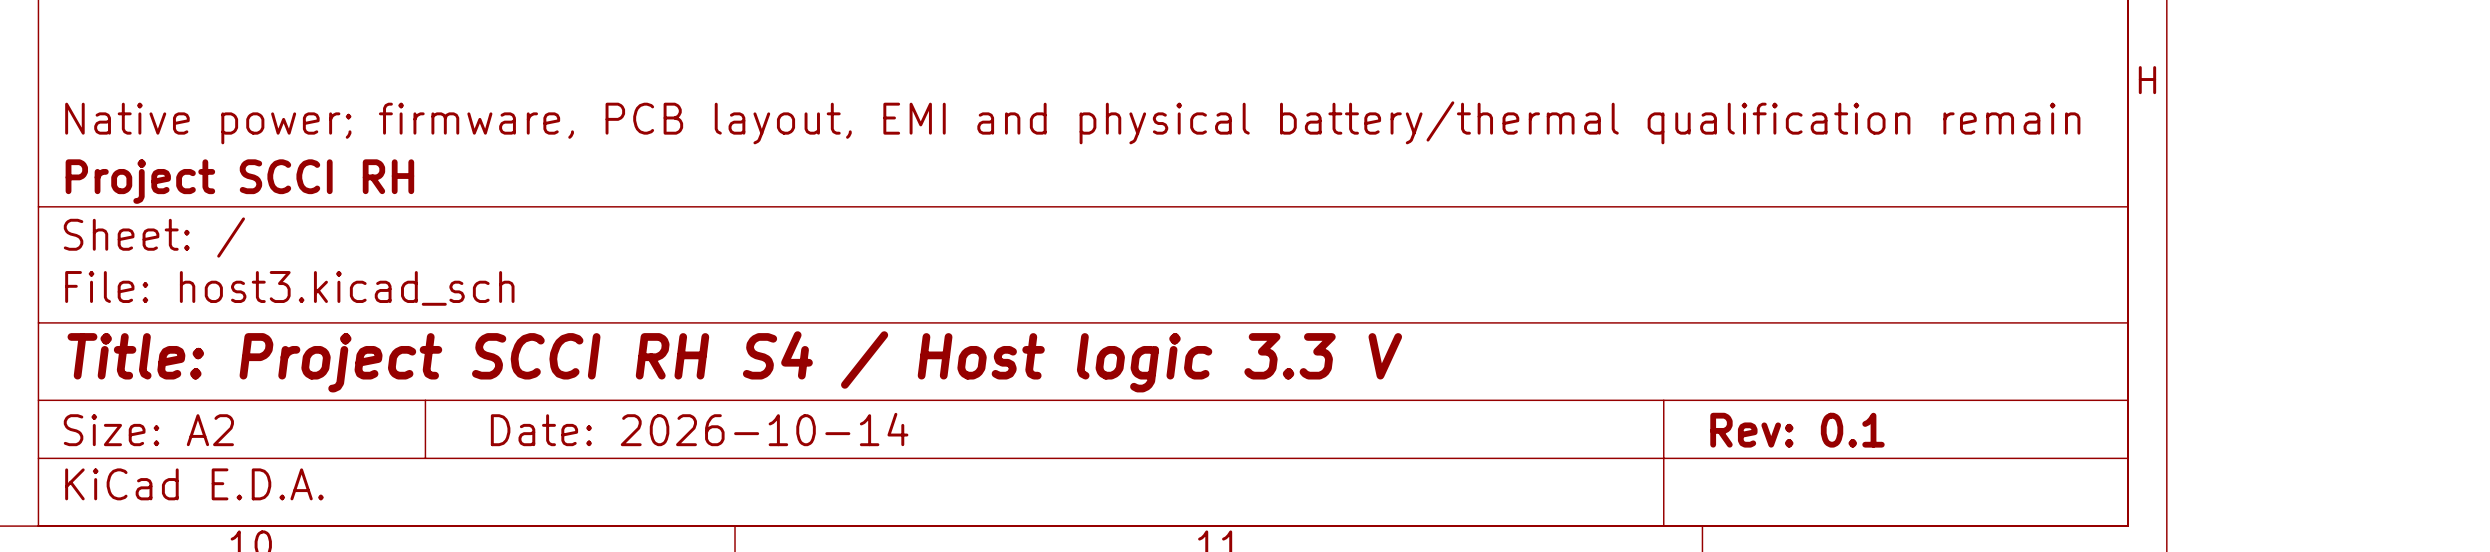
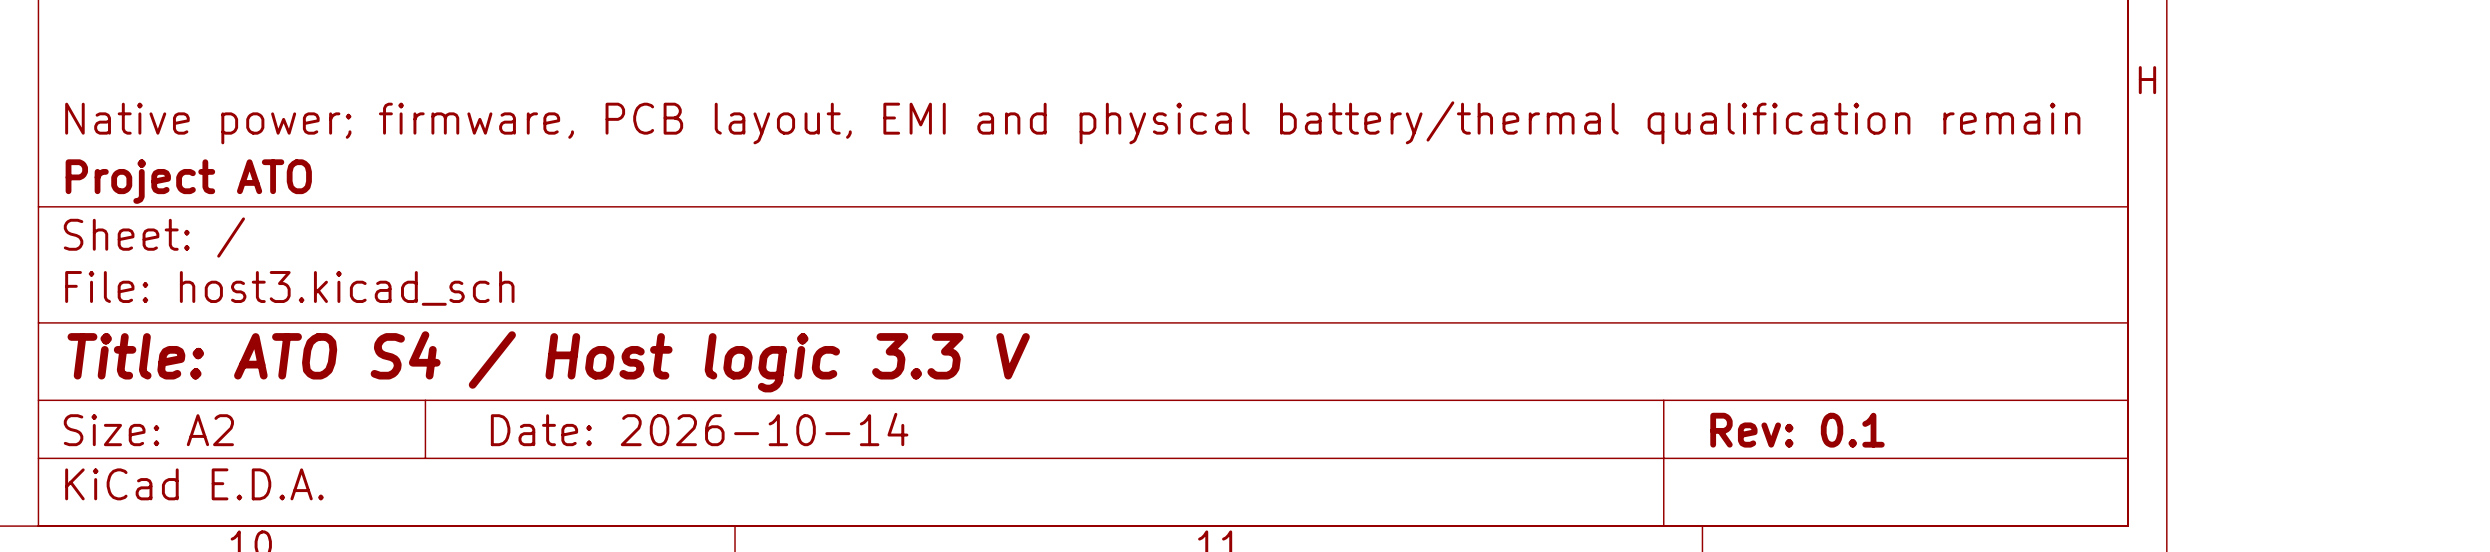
title block: Project SCCI RH (239, 181) -> Project ATO (188, 181)
title block: Title: Project SCCI RH S4 / Host logic 3.3 V (734, 361) -> Title: ATO S4 / Host logic 3.3 V (548, 361)

